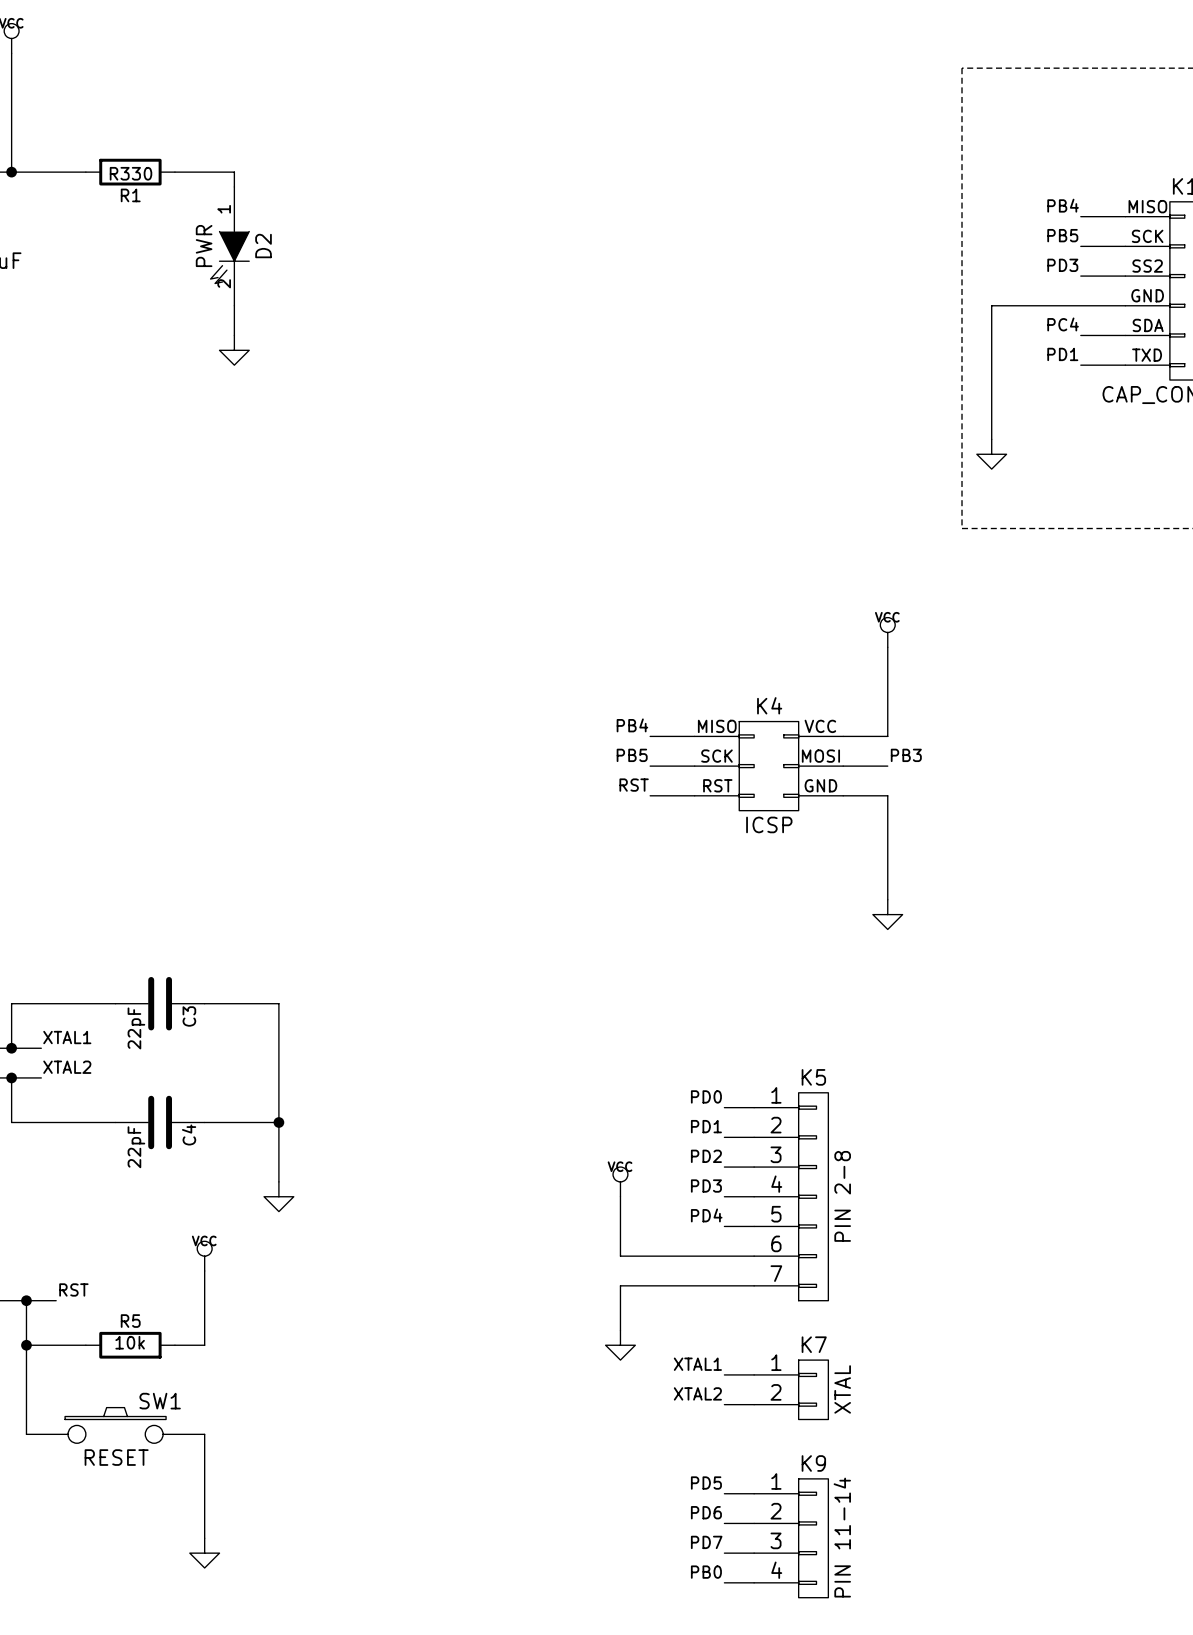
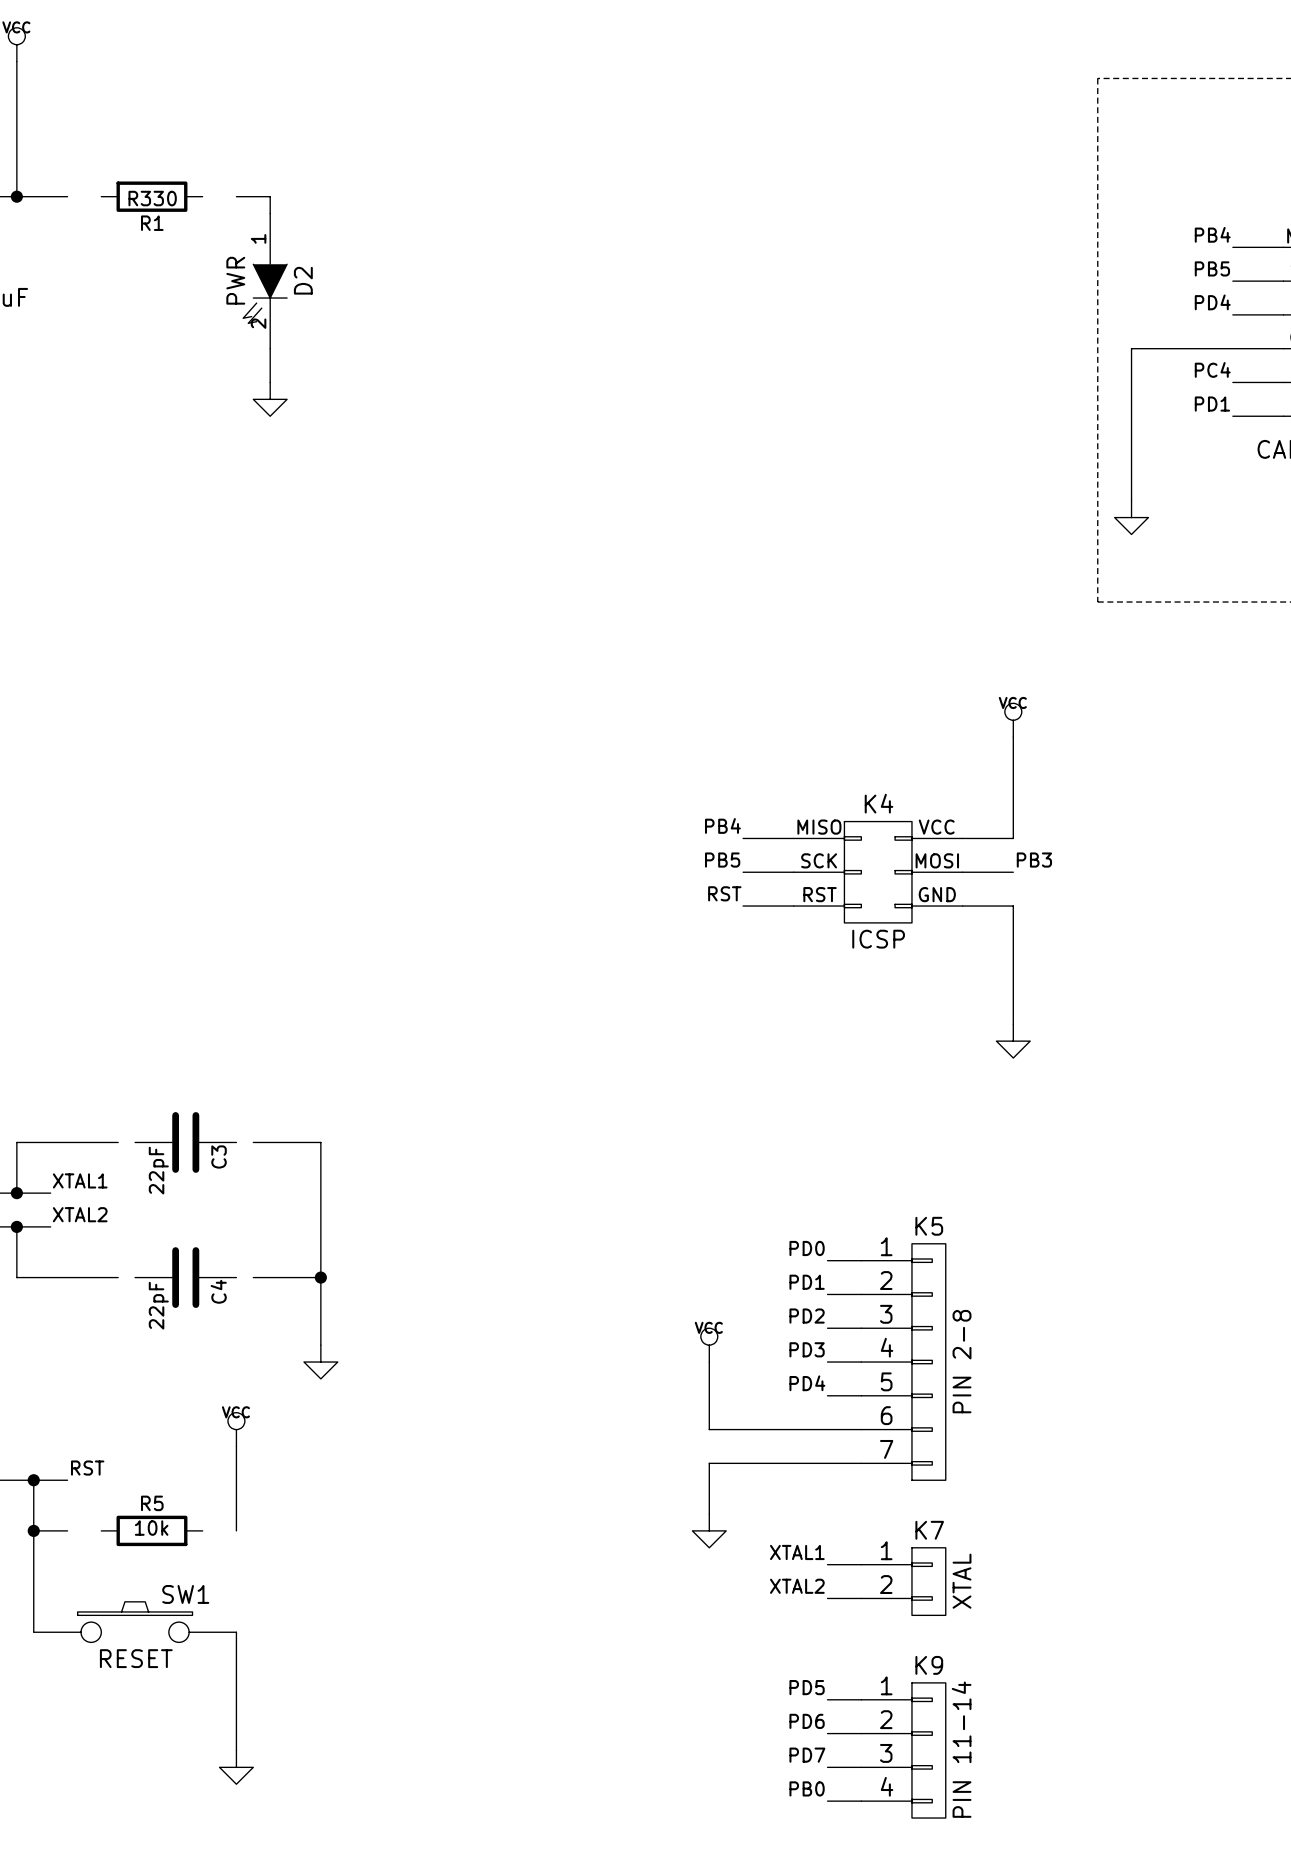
wire: (56, 172) (85, 172) -> none
wire: (174, 172) (204, 172) -> none
label: PD3 (1062, 265) -> PD4 (1212, 302)
wire: (100, 1003) (115, 1003) -> none
wire: (204, 1003) (219, 1003) -> none
wire: (100, 1122) (115, 1122) -> none
wire: (204, 1122) (219, 1122) -> none
wire: (56, 1345) (85, 1345) -> none
wire: (174, 1345) (204, 1345) -> none

